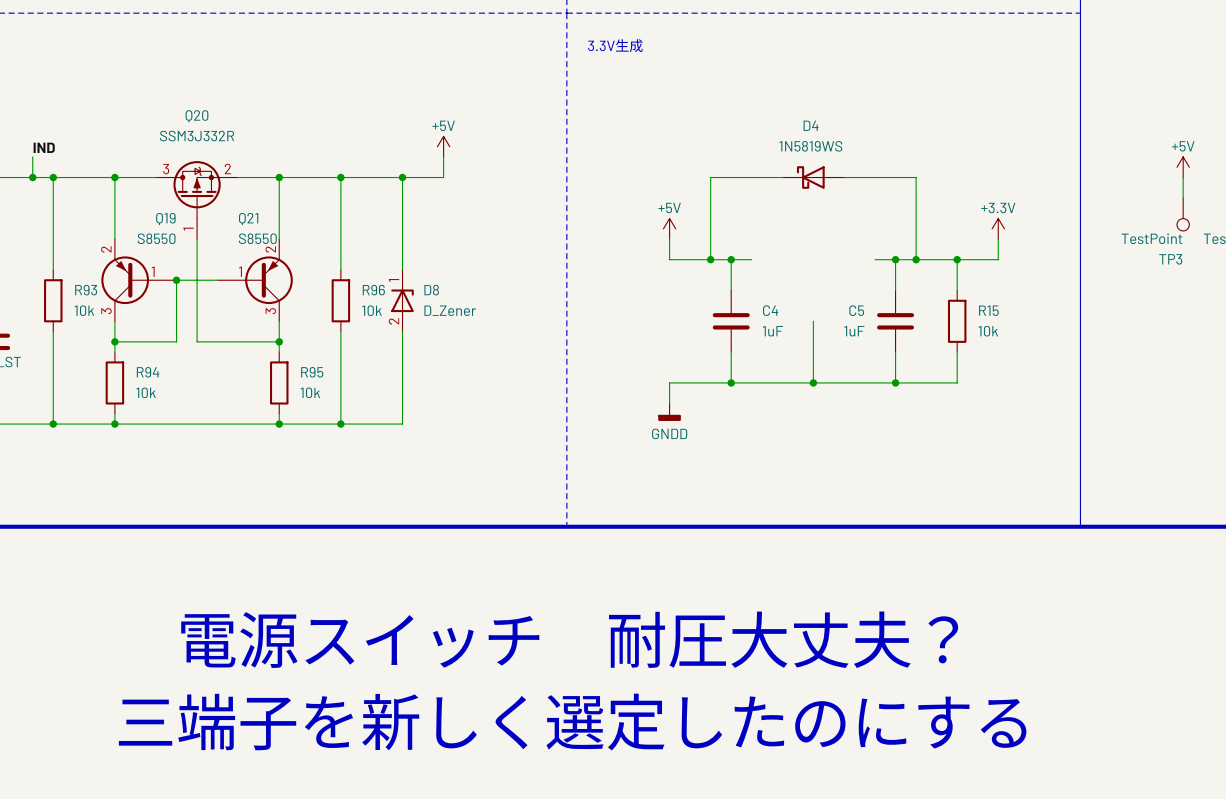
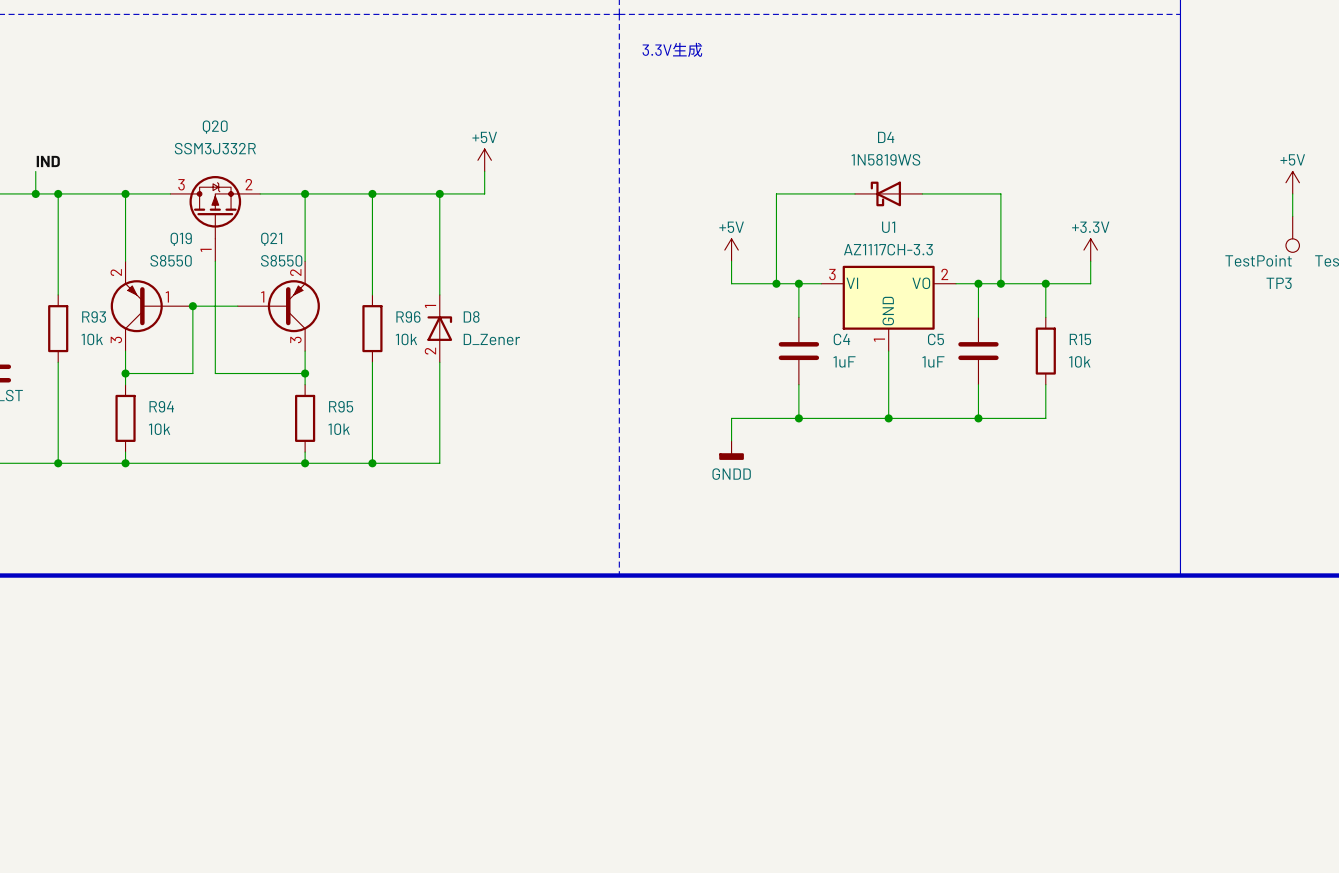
U1: none -> AZ1117CH-3.3 (888, 308)
text: 電源スイッチ 耐圧大丈夫？ (569, 639) -> none
text: 三端子を新しく選定したのにする (572, 722) -> none

